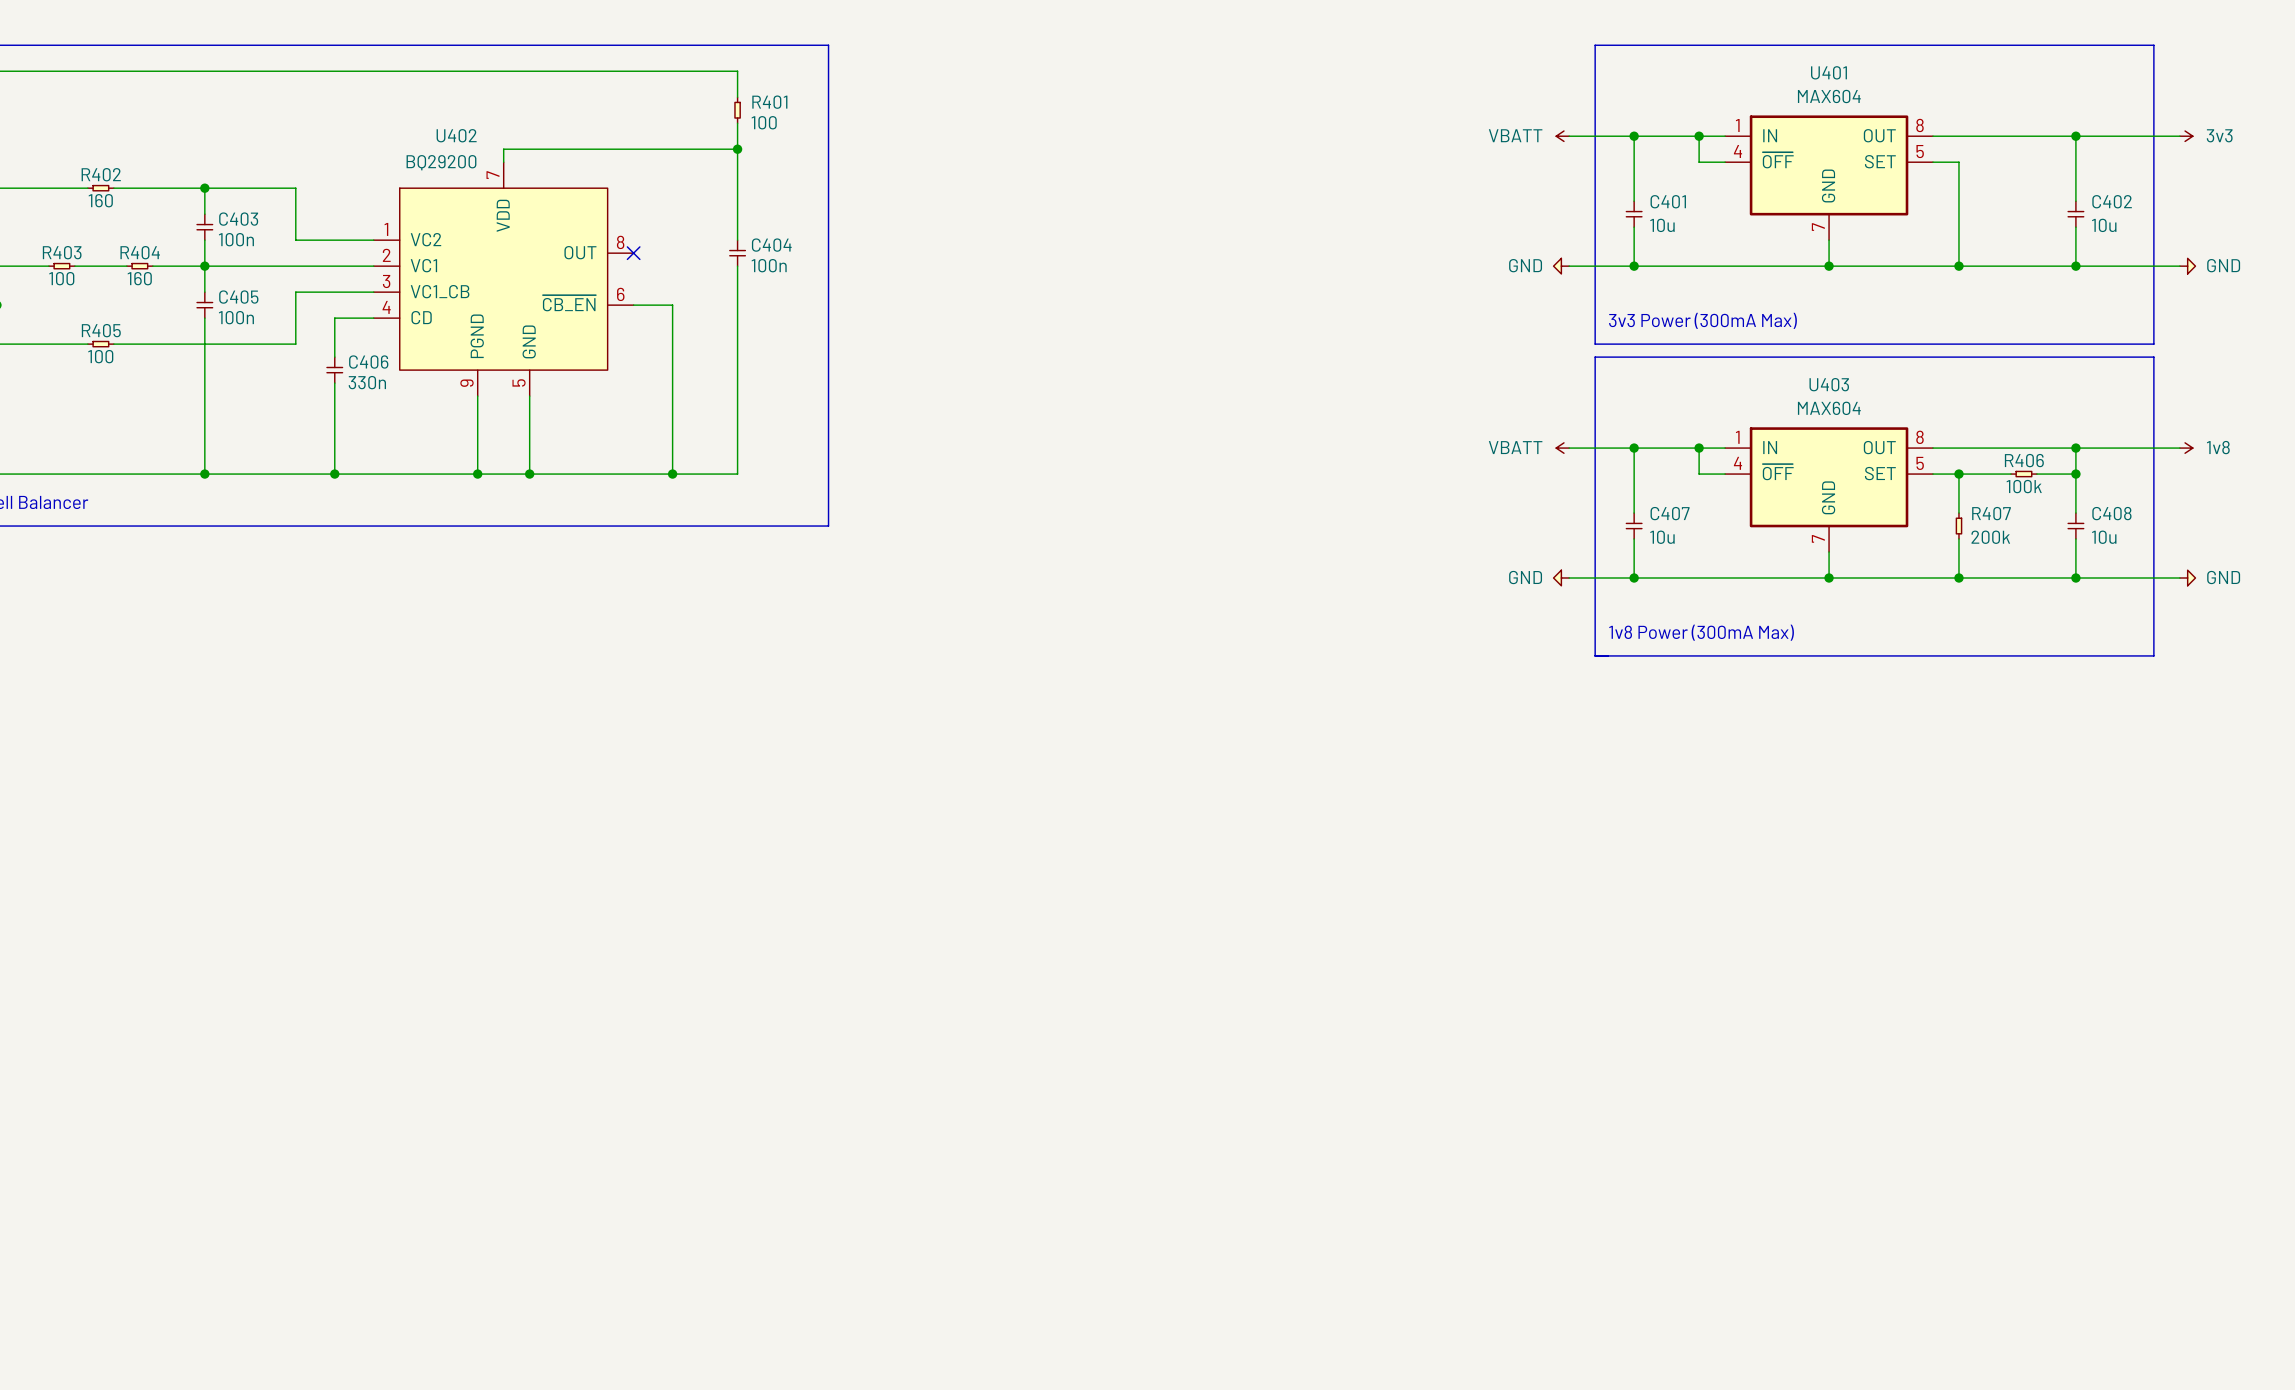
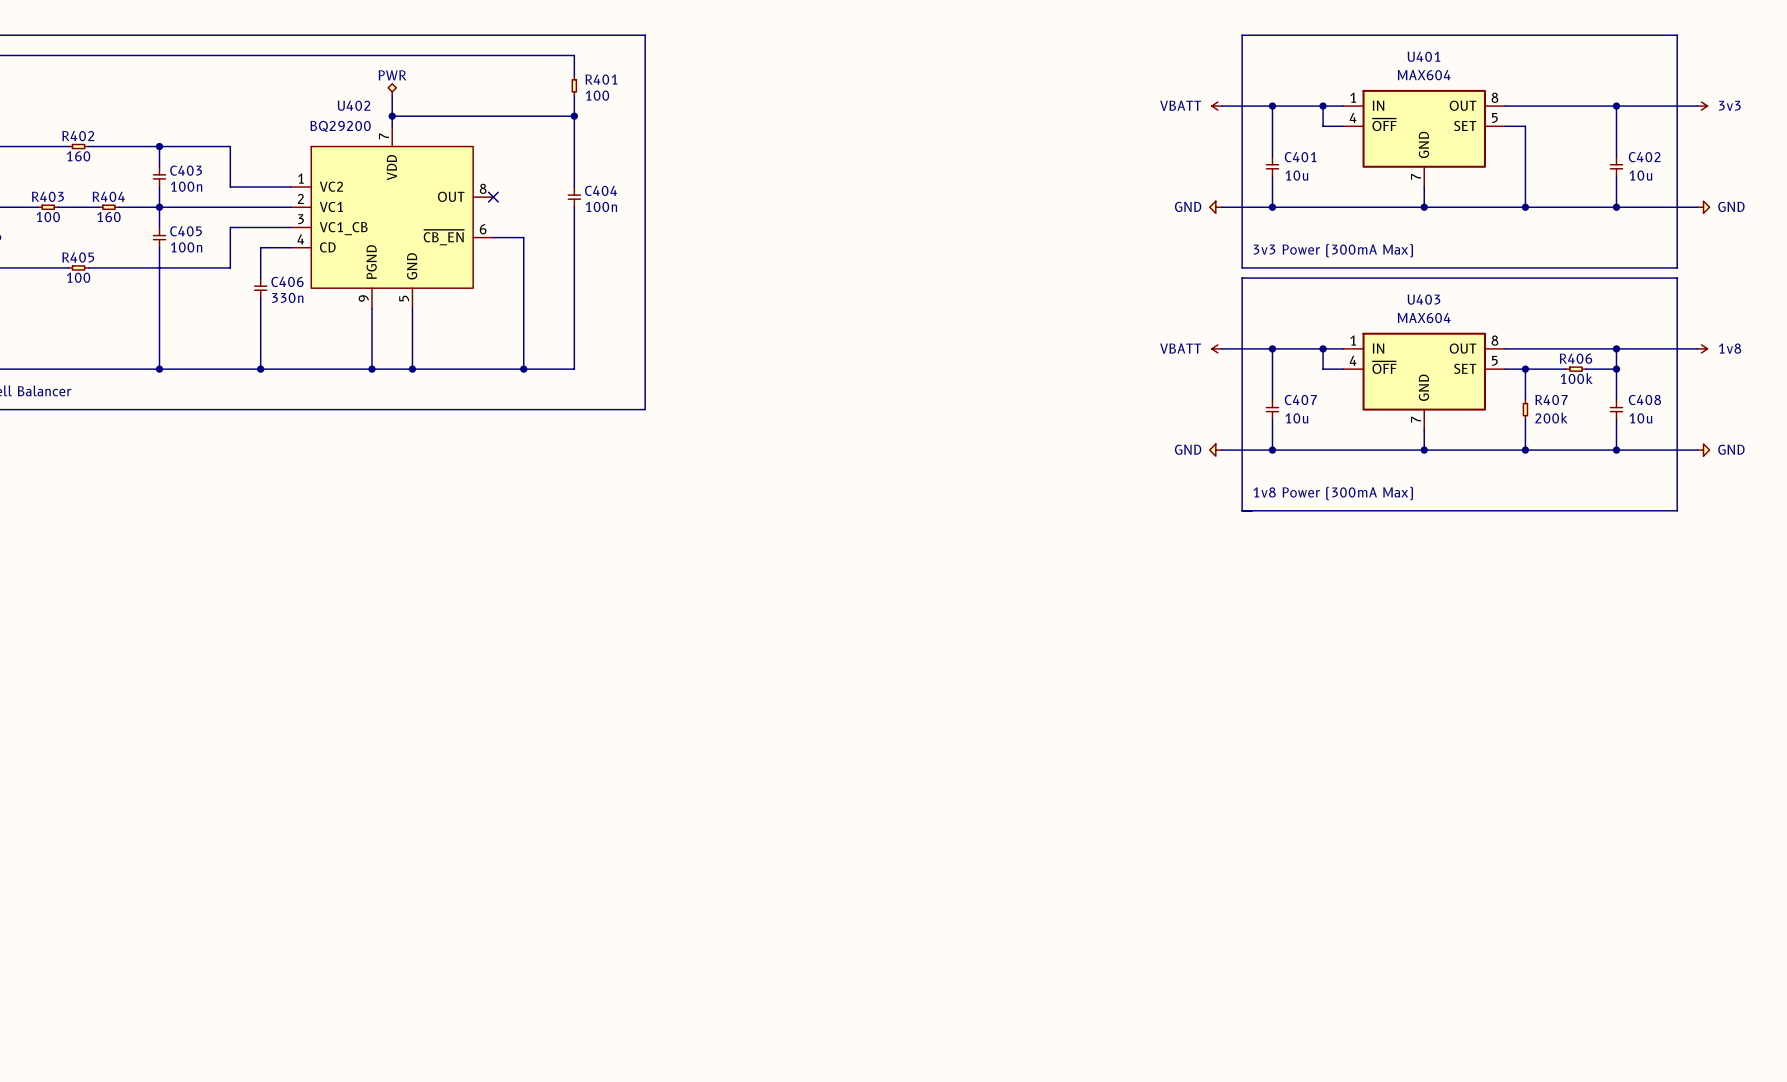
power symbol: none -> PWR (392, 89)
wire: none -> (392, 95) (392, 116)
junction: none -> (392, 116)

